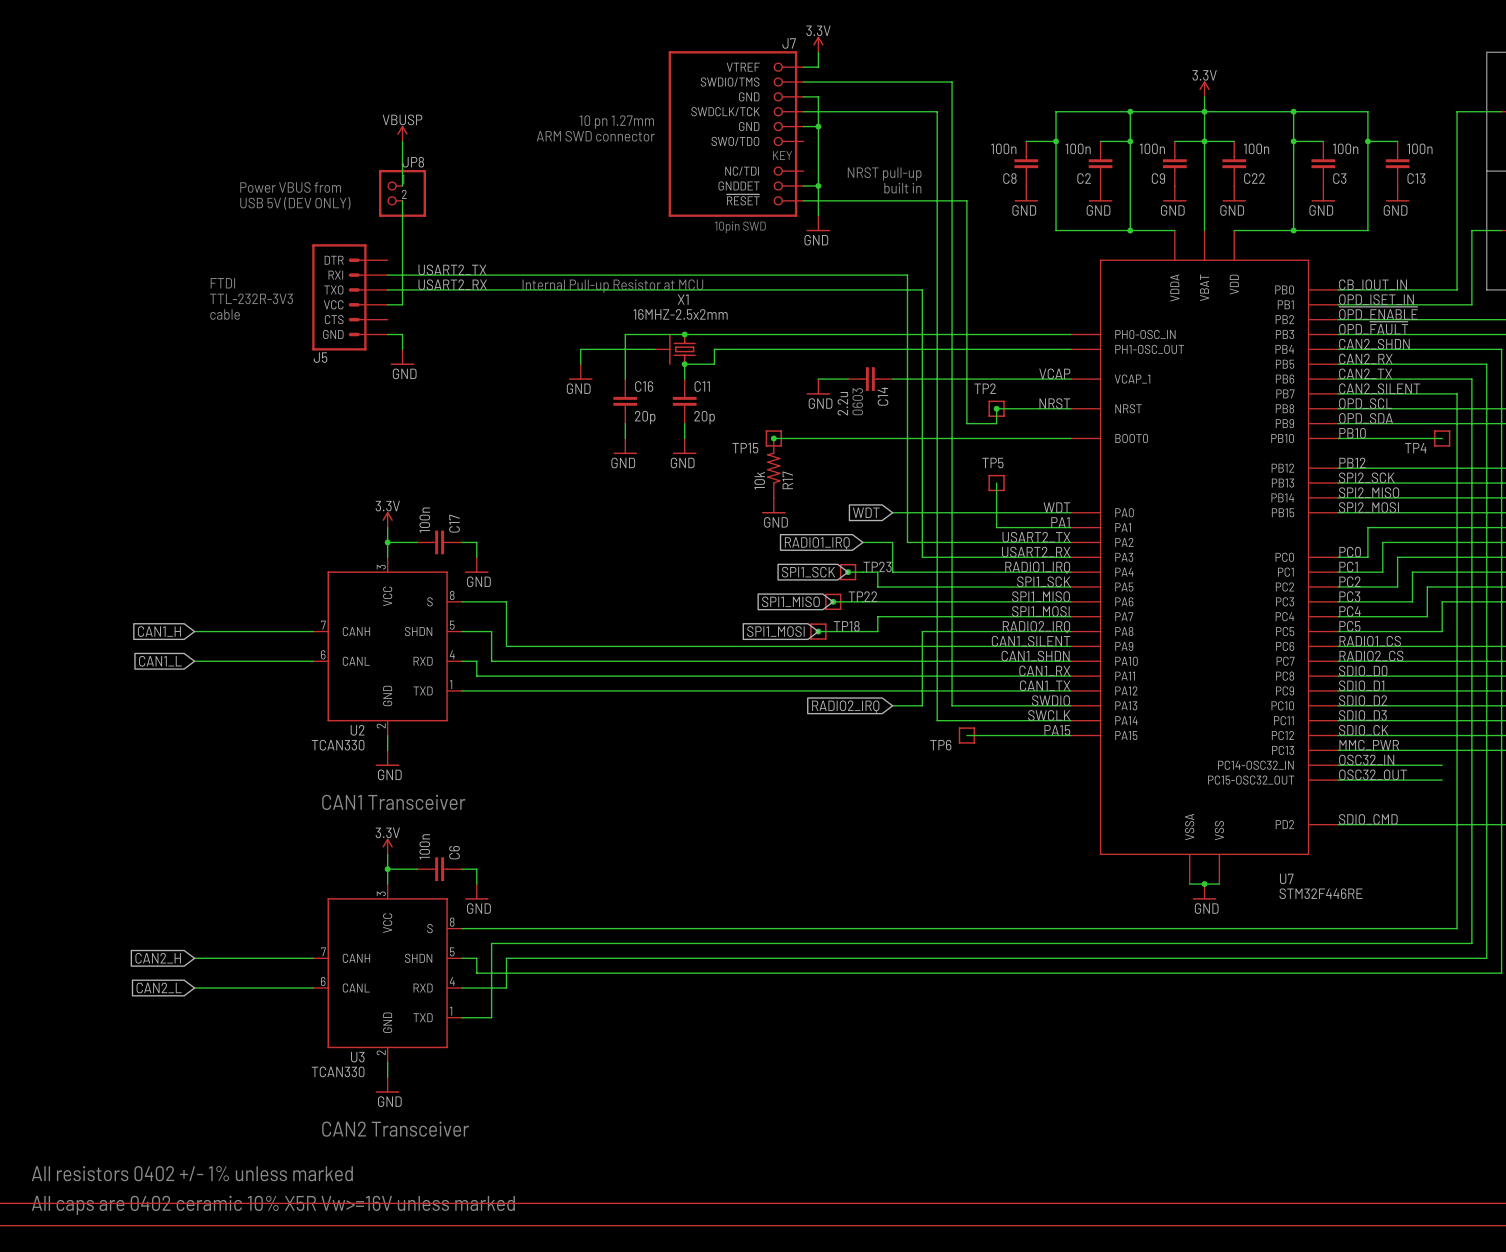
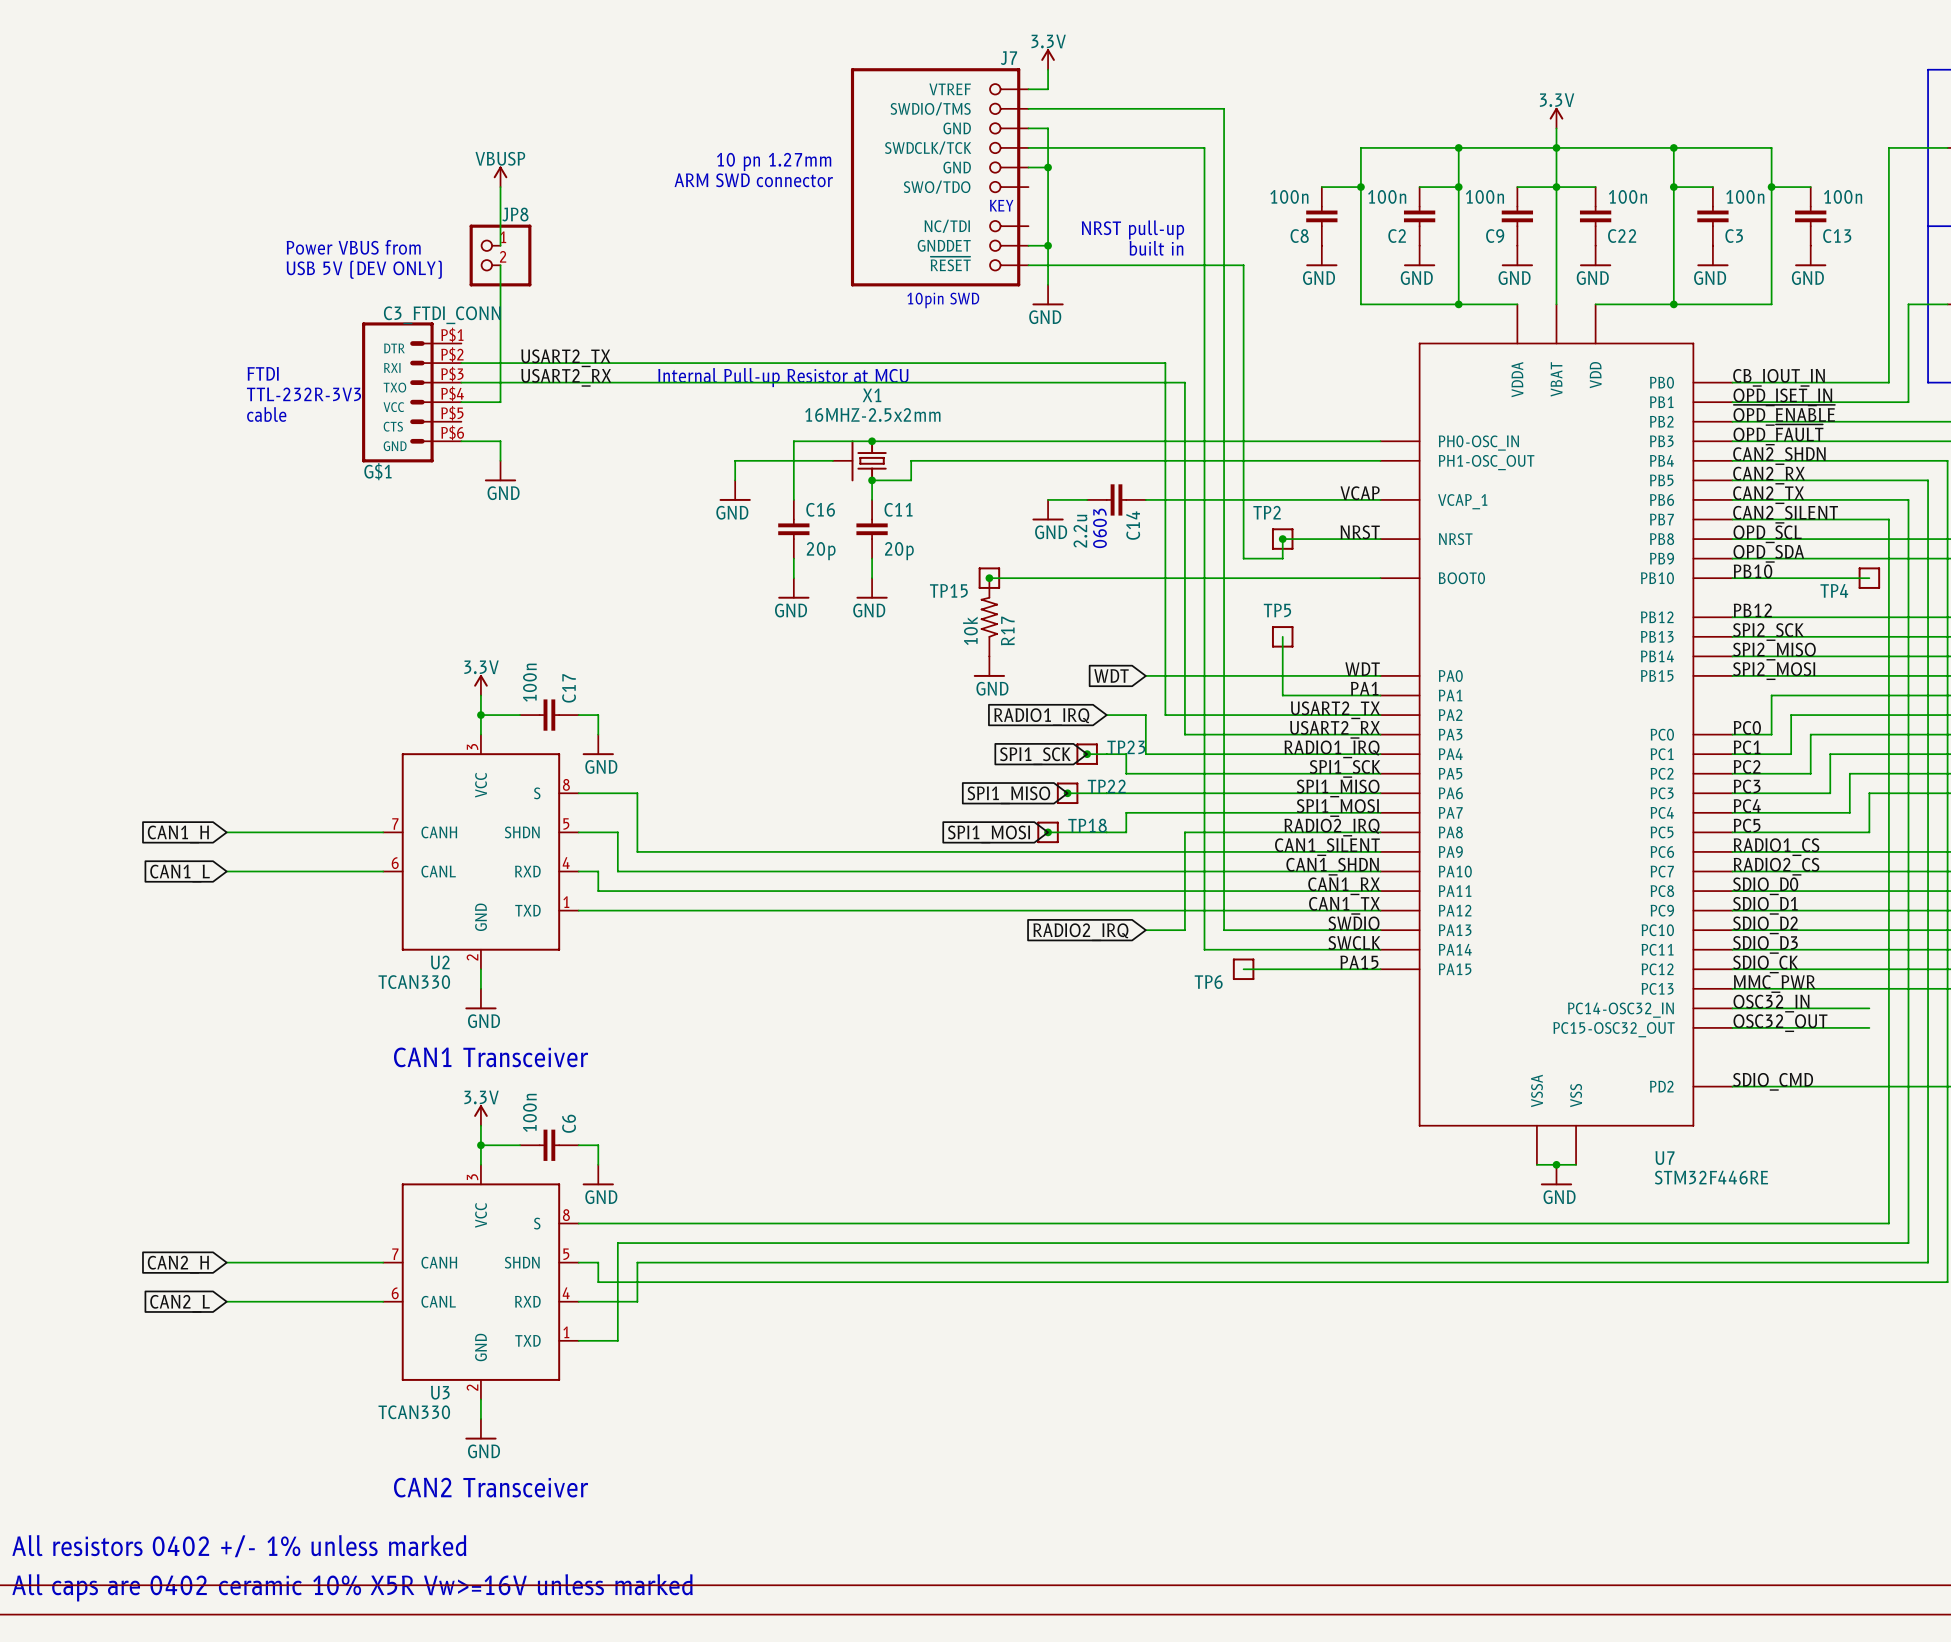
part: none -> C3_FTDI_CONN (411, 392)
J5: (349, 297) -> none

